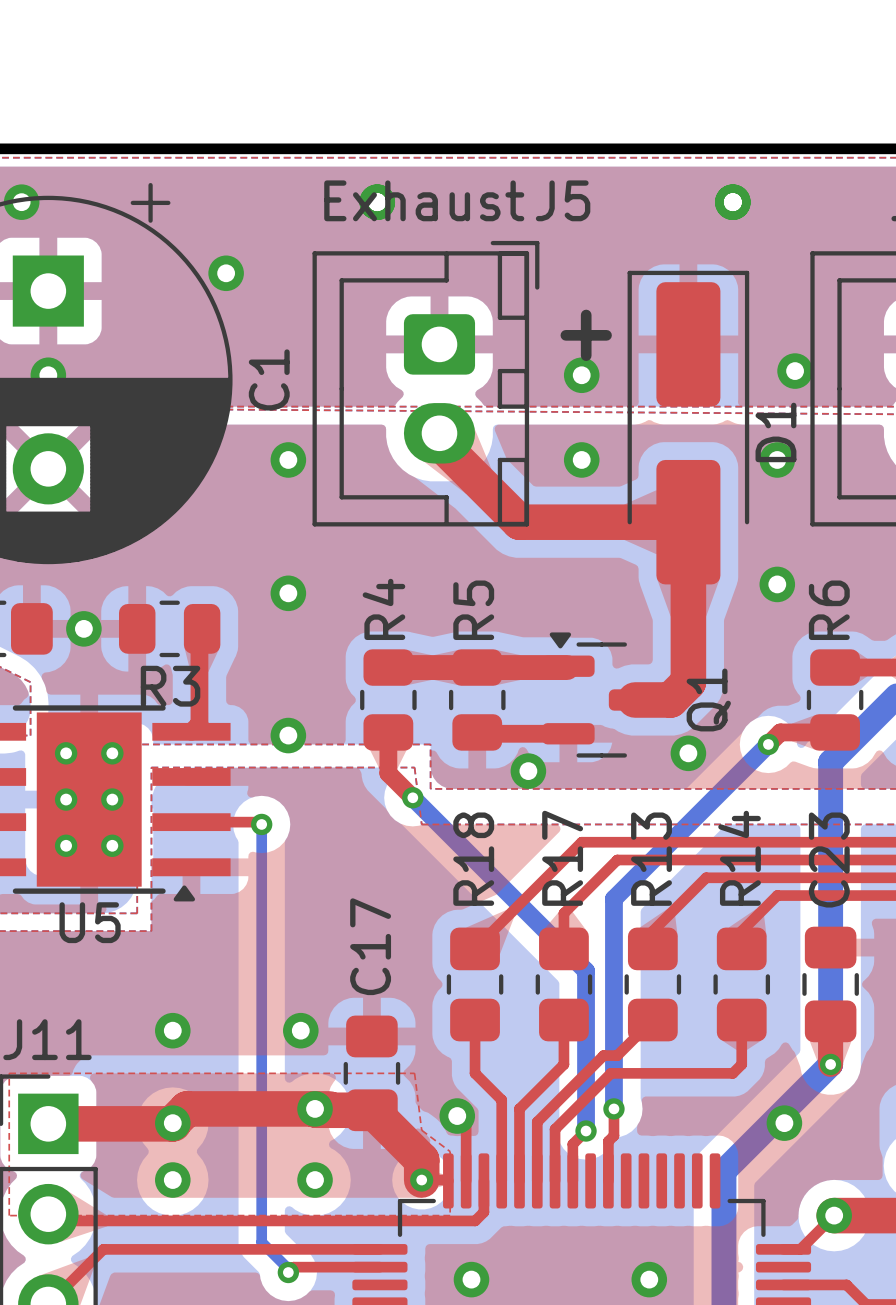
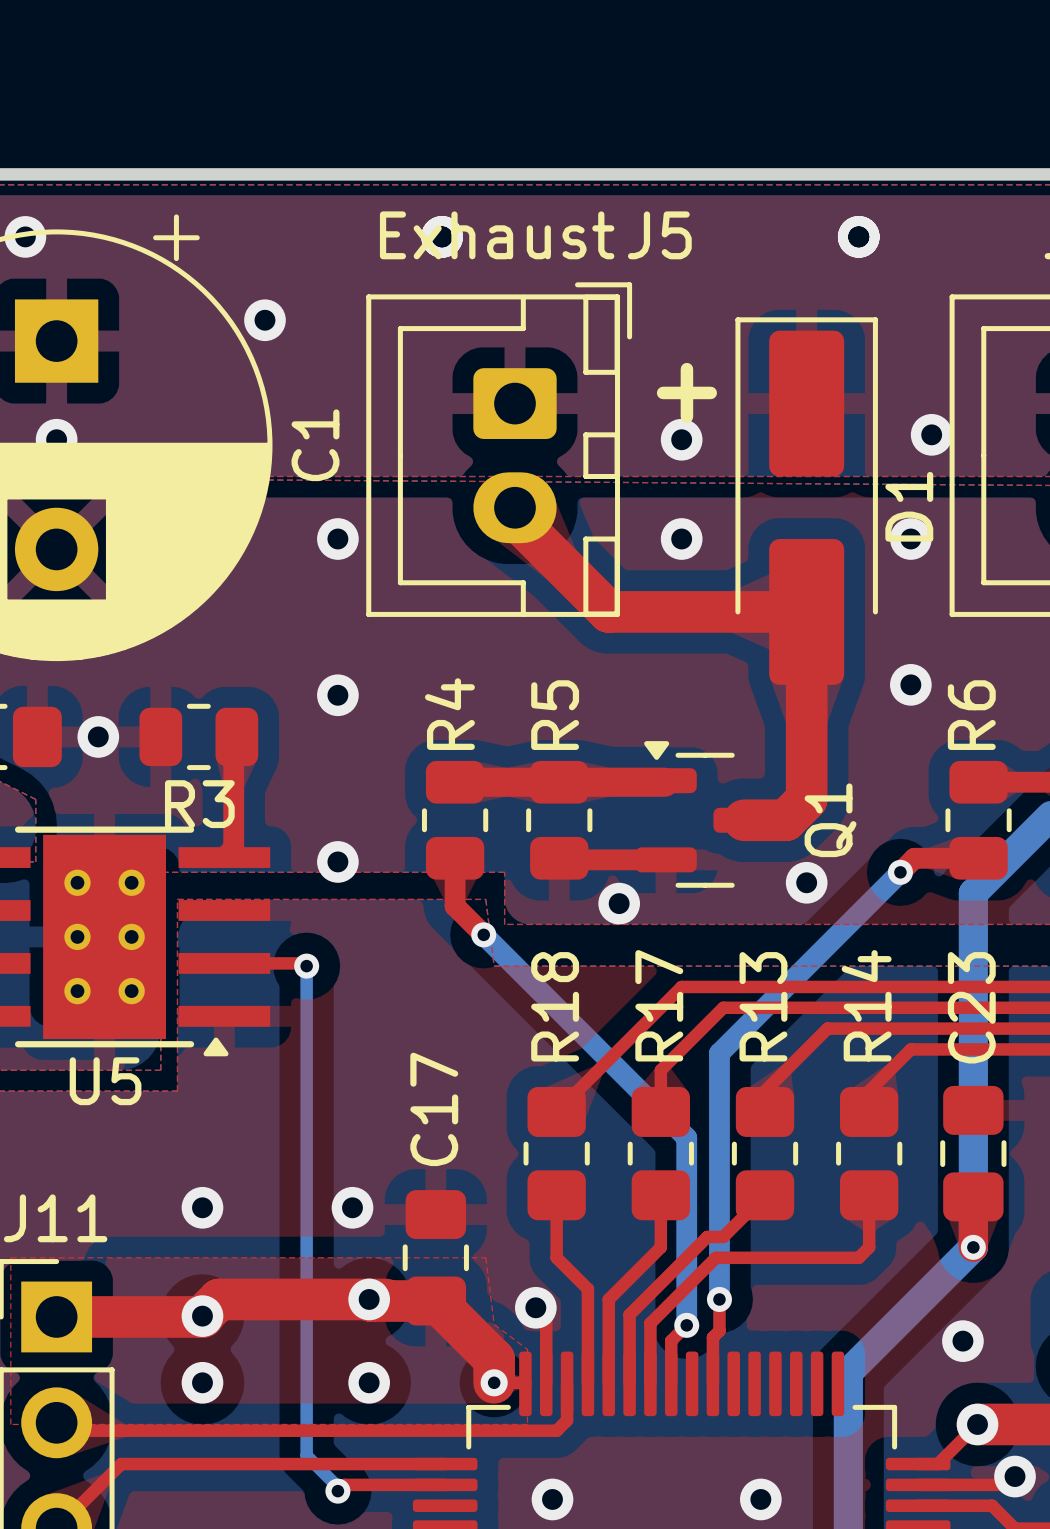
via position: (784, 1123) -> (962, 1341)
top track: none -> (1015, 1476) (1006, 1484) (918, 1484)
via: none -> (1015, 1476)

